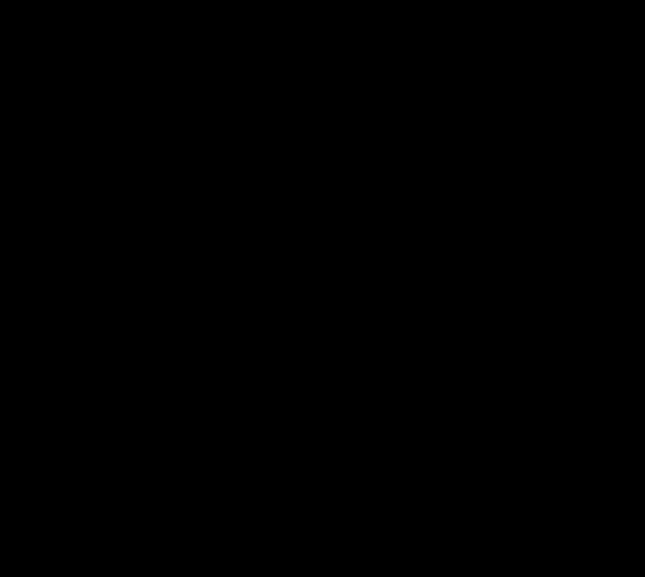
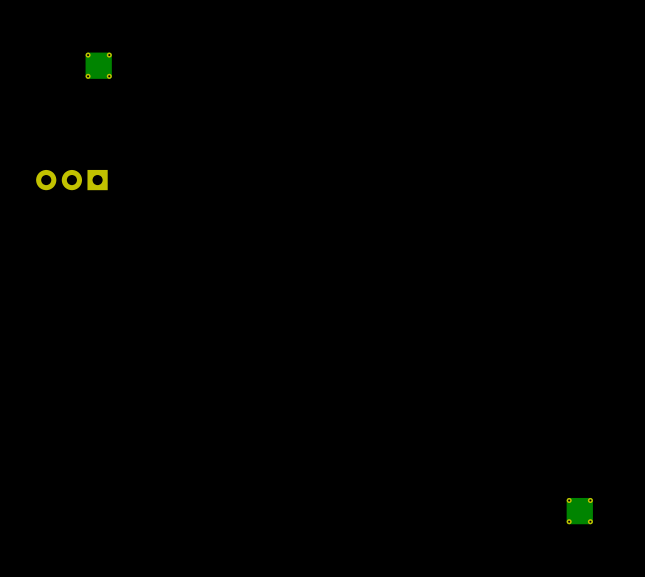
part: none -> (98, 65)
part: none -> (71, 180)
part: none -> (579, 511)

